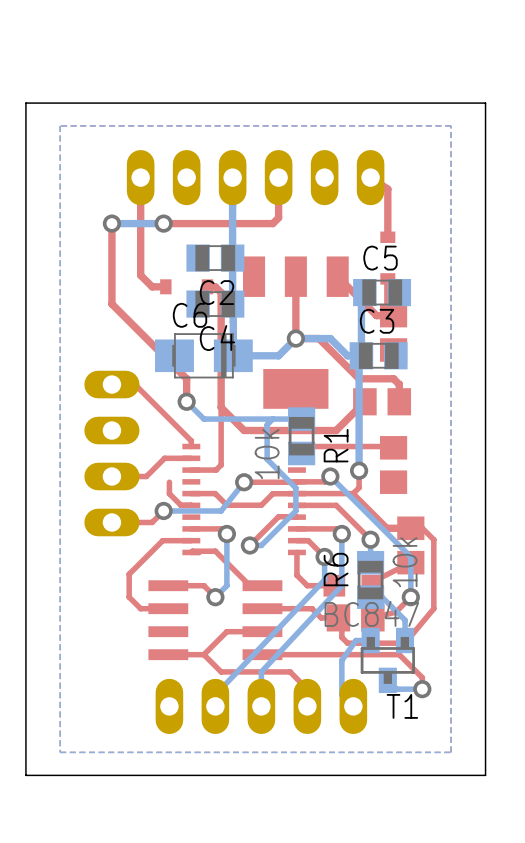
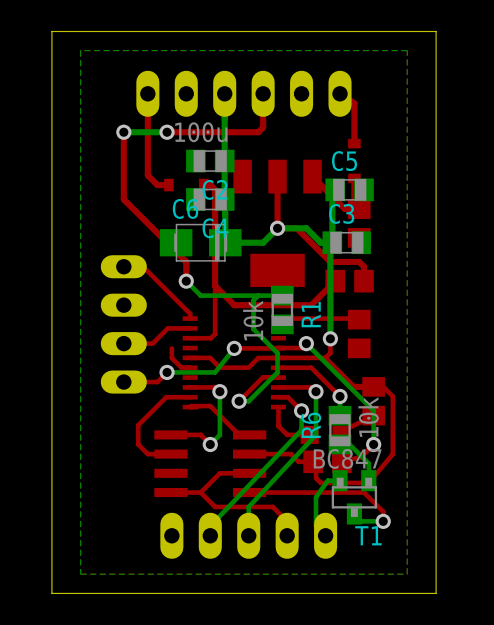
C2 value: none -> 100u (201, 132)

